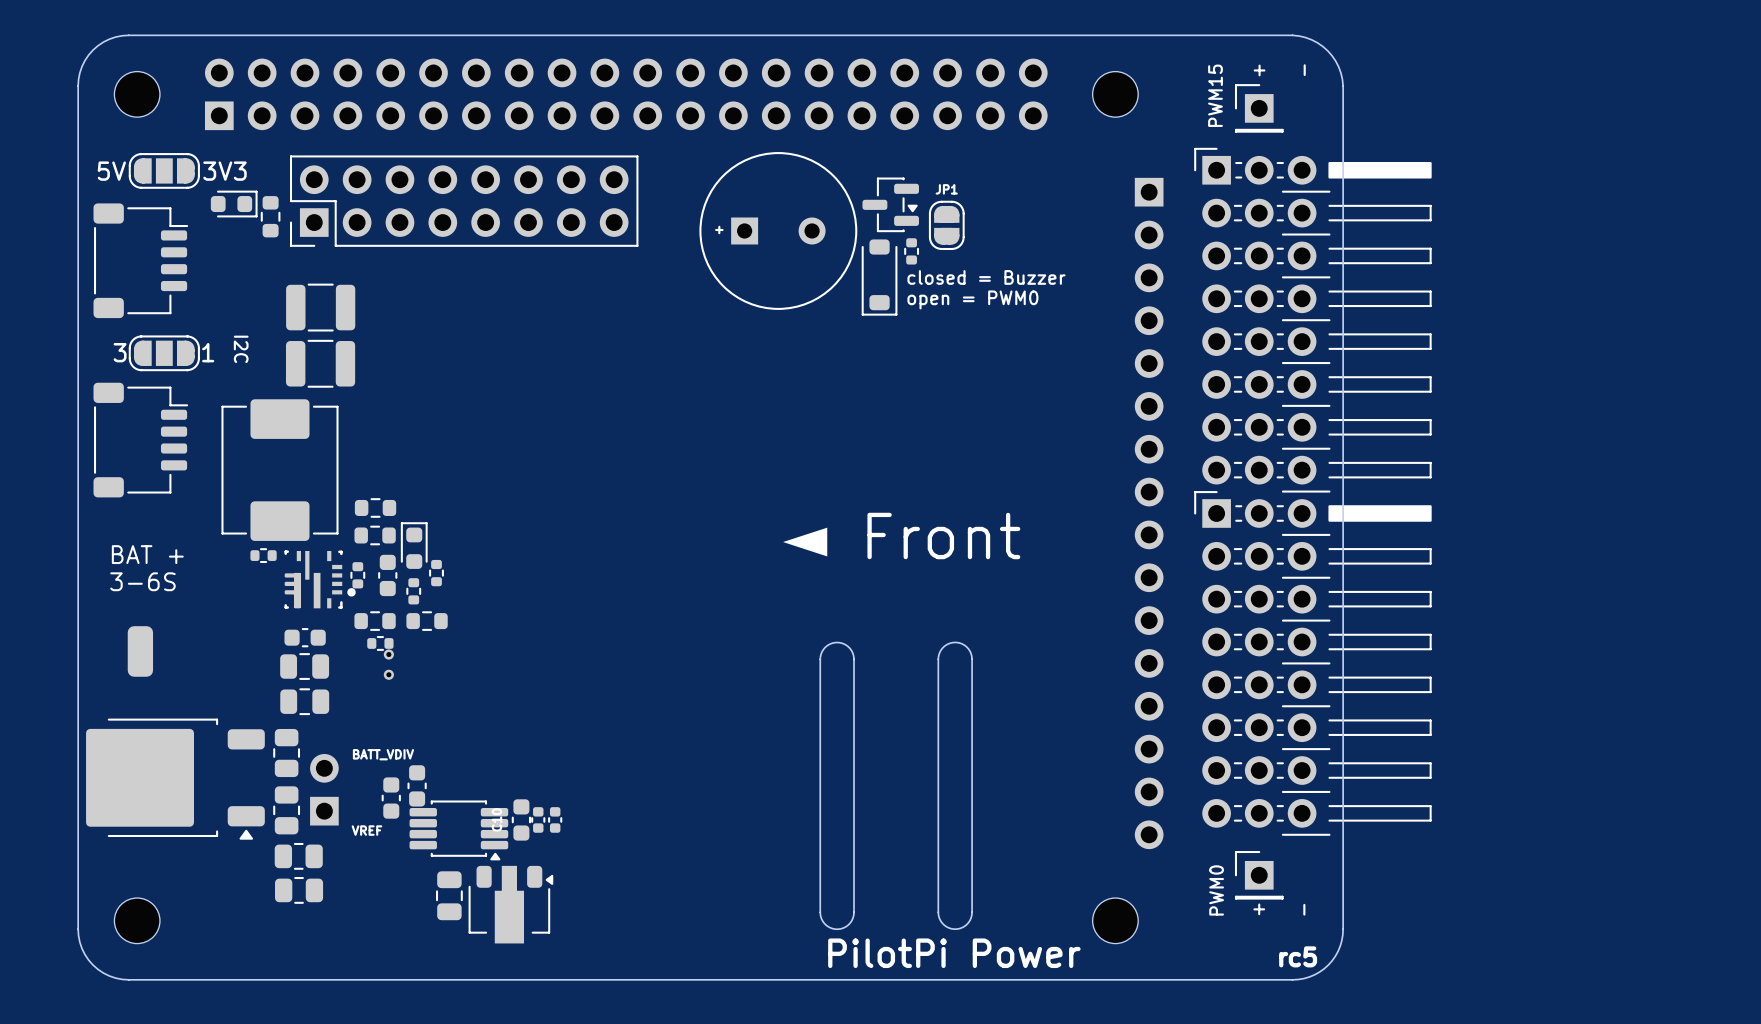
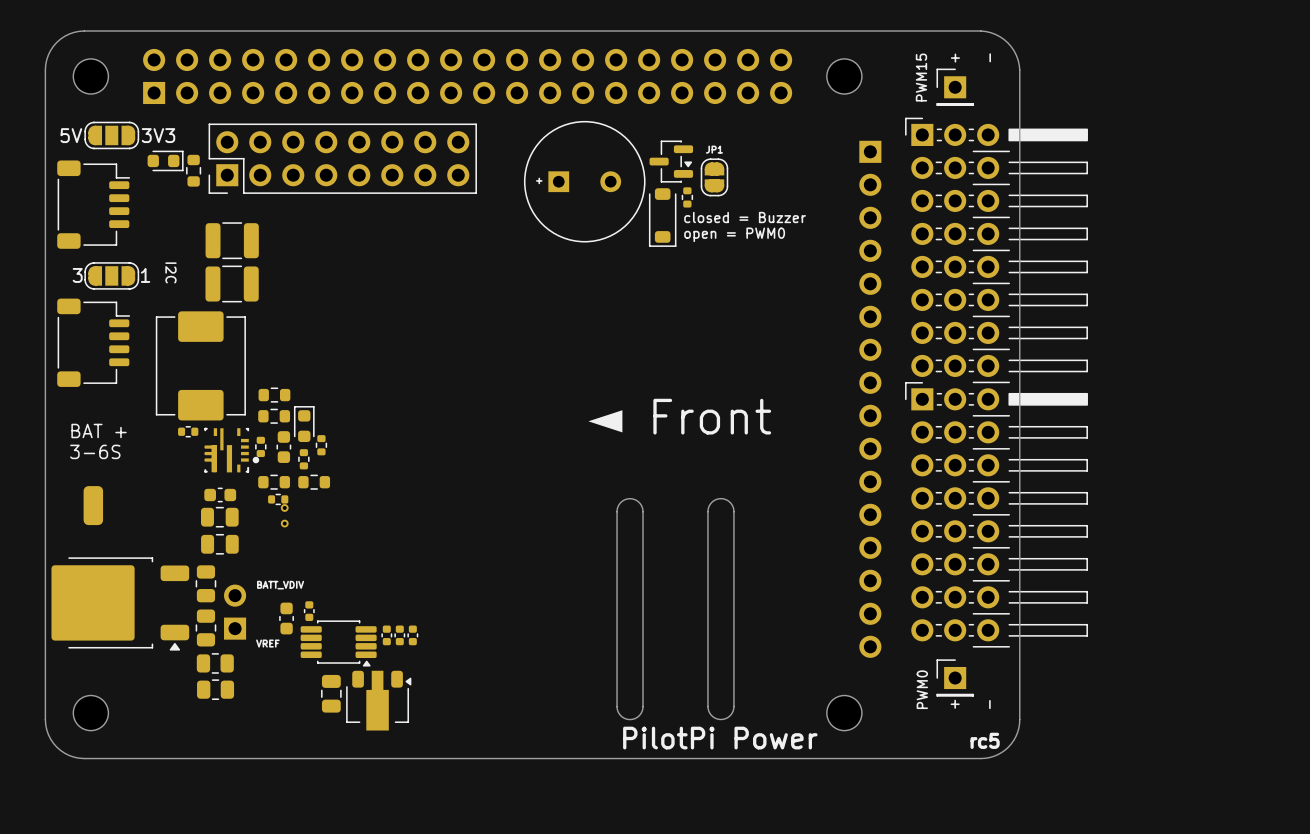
part footprint: [407, 765, 427, 807] -> [303, 601, 315, 622]
part: (521, 819) -> none
part: none -> (386, 635)

